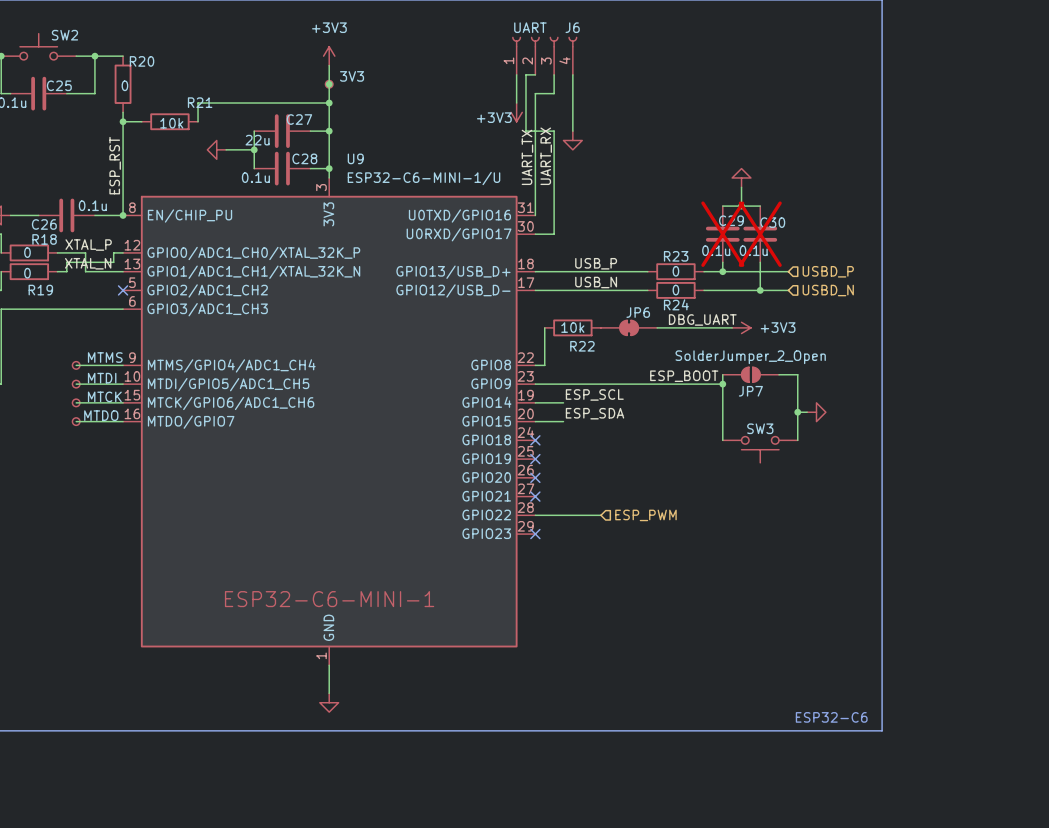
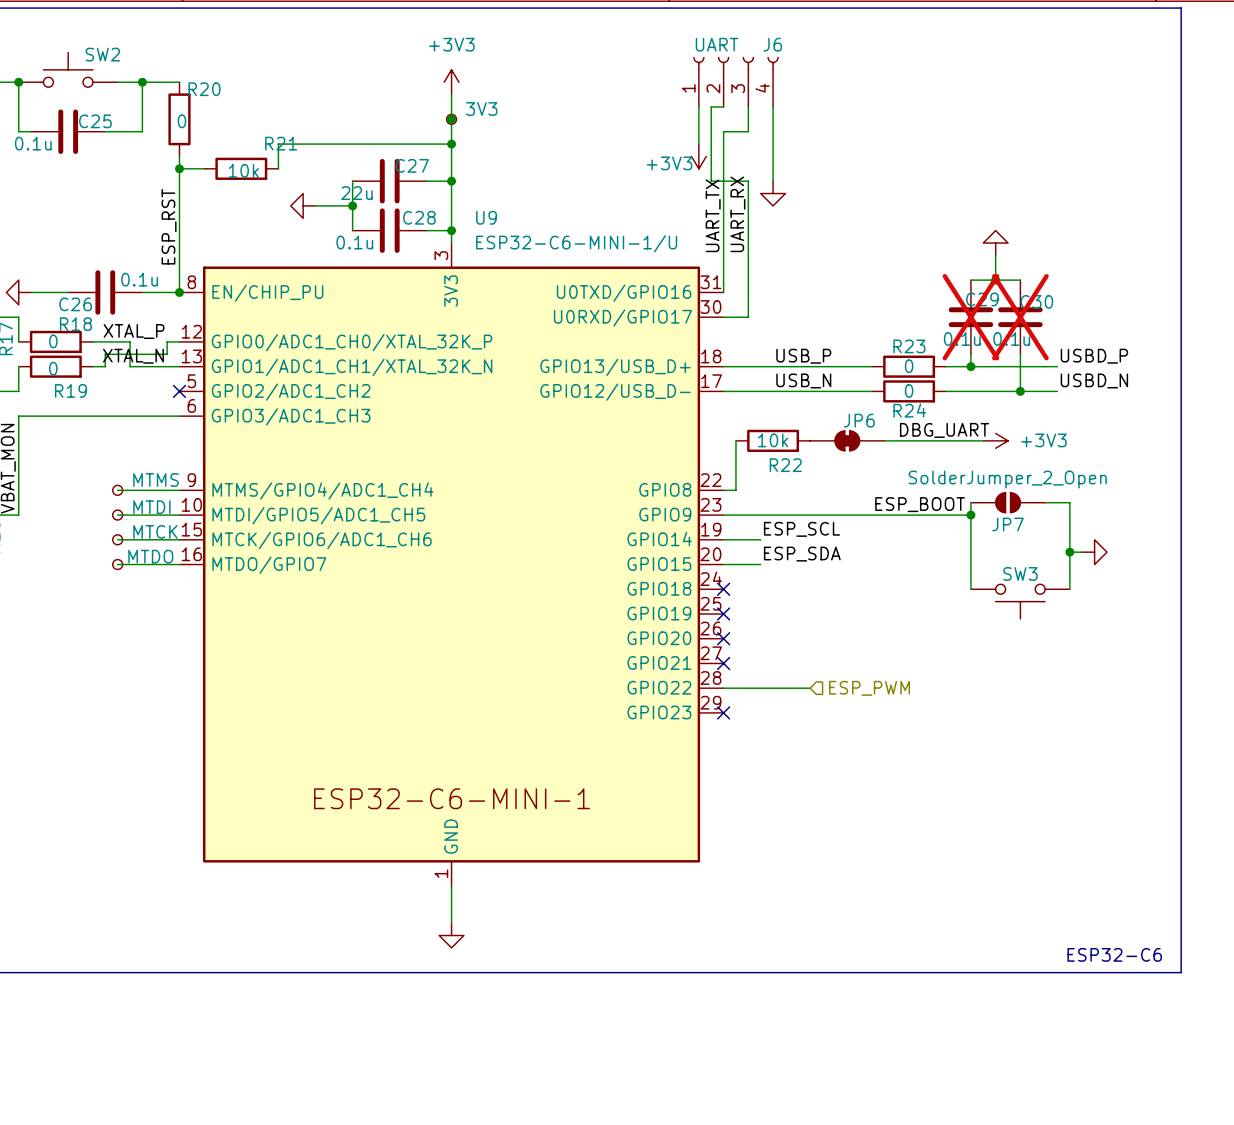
label: none -> USBD_P (1094, 356)
hierarchical label: USBD_P (828, 271) -> none
label: none -> USBD_N (1094, 380)
hierarchical label: USBD_N (828, 290) -> none

